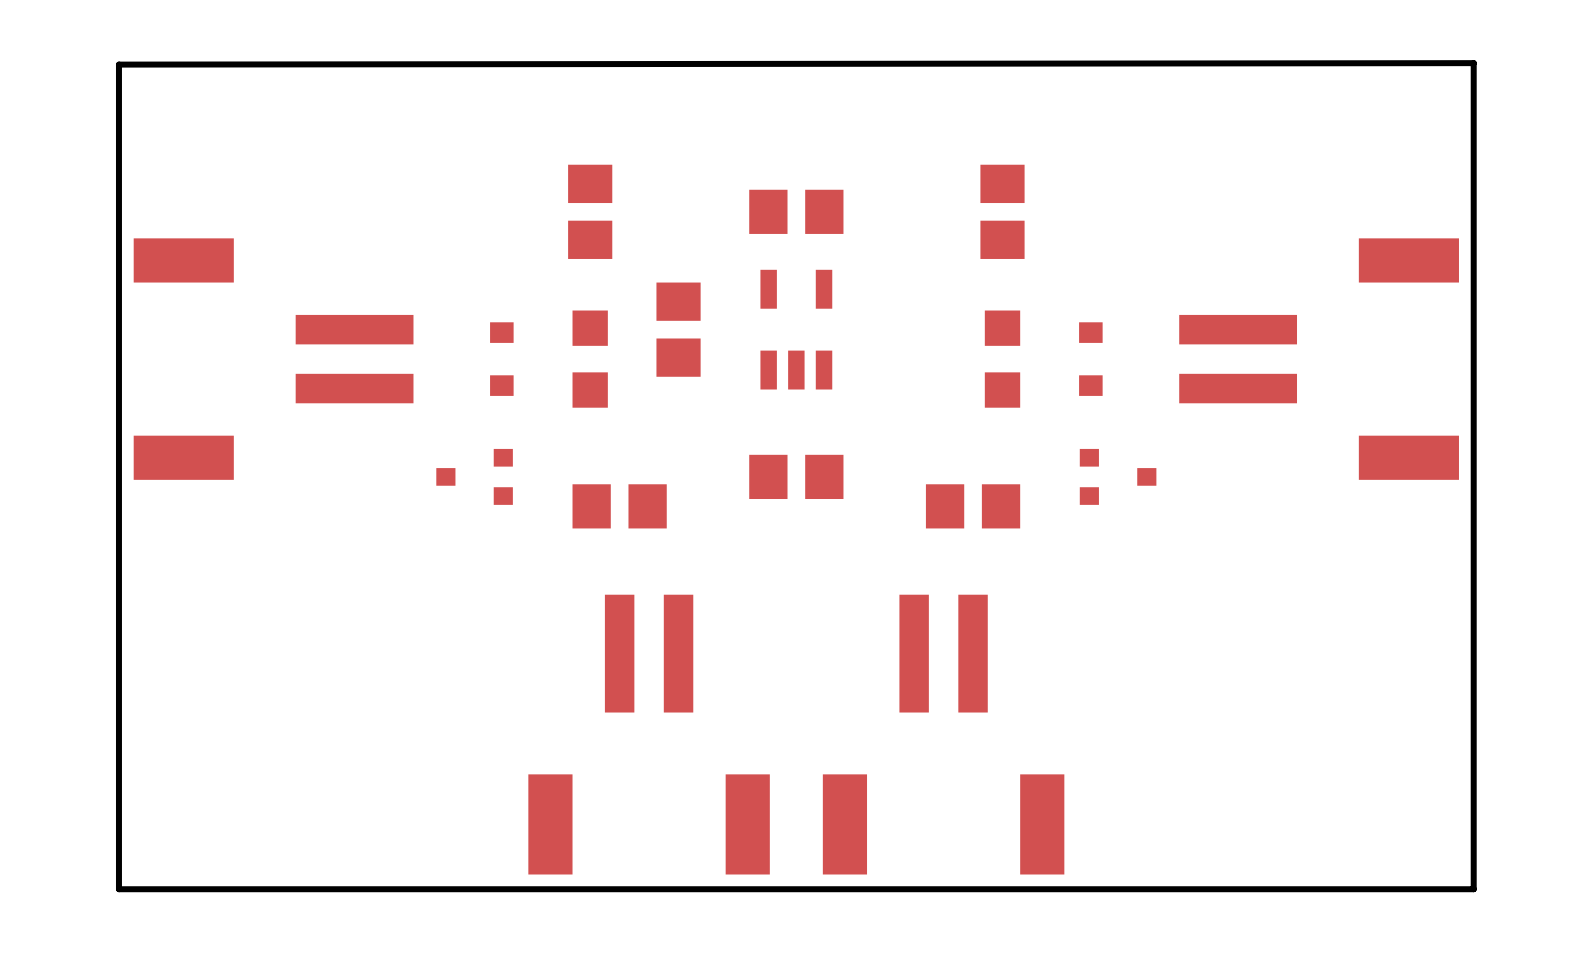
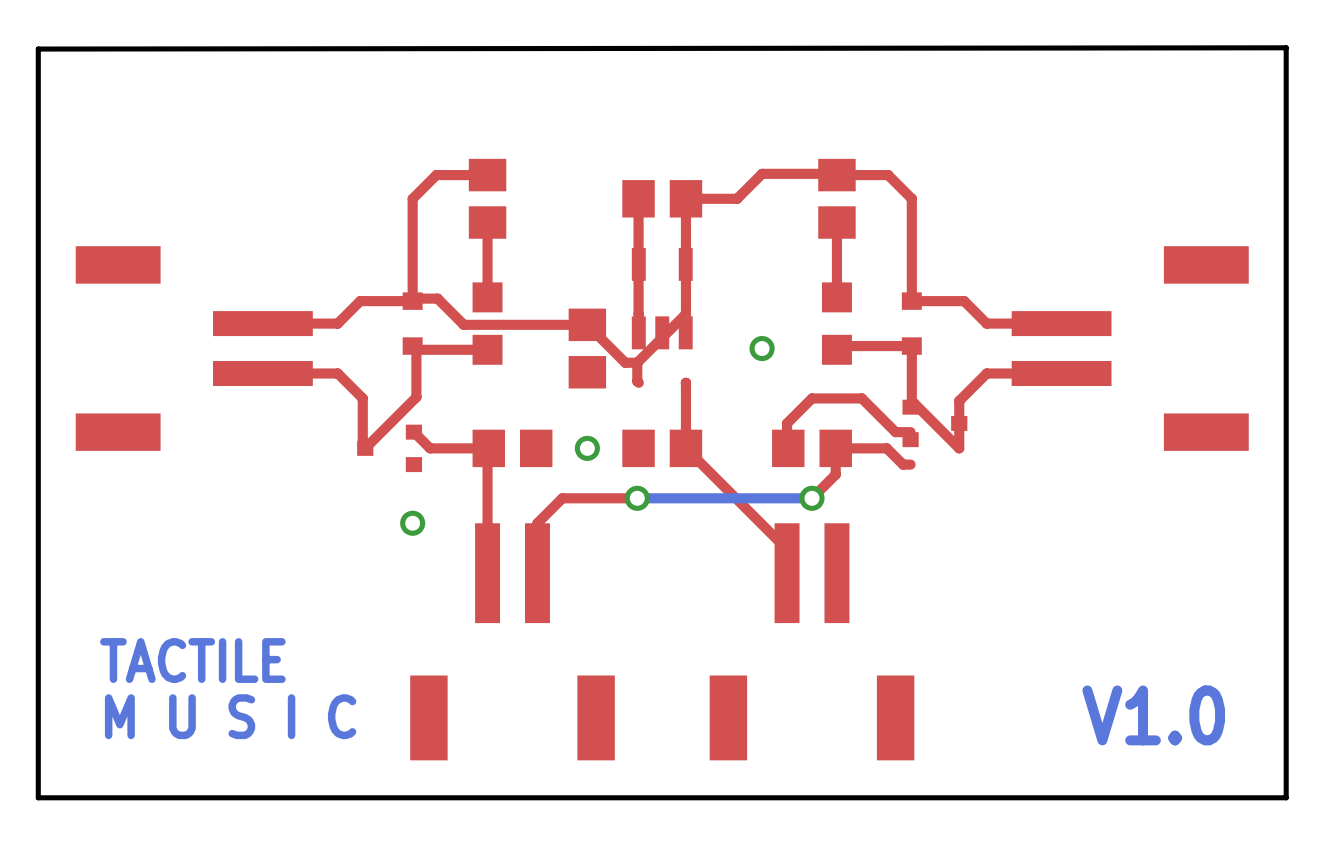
board edge: (1473, 63) (1473, 889) (118, 889) (118, 64) (1473, 63) -> (1286, 47) (1286, 797) (38, 797) (38, 49) (1286, 47)
top track: none -> (487, 175) (436, 175) (412, 198) (412, 301)
top track: none -> (638, 198) (638, 314)
top track: none -> (487, 222) (487, 297)
top track: none -> (836, 222) (836, 297)
part position: (678, 329) -> (587, 348)
top track: none -> (412, 301) (360, 301) (337, 323) (262, 323)
top track: none -> (412, 301) (415, 298) (437, 298) (463, 324) (587, 324) (625, 362) (637, 362)
top track: none -> (685, 314) (685, 198) (737, 198) (762, 173) (888, 175) (911, 198) (911, 301) (964, 301) (986, 323) (1061, 323)
part position: (273, 359) -> (194, 348)
part position: (1319, 359) -> (1130, 348)
top track: none -> (685, 325) (685, 314) (637, 362)
via: none -> (762, 348)
top track: none -> (416, 349) (416, 397) (365, 448) (362, 445) (362, 398) (337, 373) (262, 373)
top track: none -> (487, 349) (416, 349)
top track: none -> (836, 349) (840, 346) (911, 346) (911, 400) (959, 448) (959, 400) (986, 373) (1061, 373)
top track: none -> (637, 362) (638, 382)
top track: none -> (685, 382) (685, 448) (787, 549) (787, 573)
part position: (474, 476) -> (389, 448)
part position: (796, 476) -> (662, 448)
top track: none -> (413, 432) (430, 448) (488, 448) (487, 573)
top track: none -> (910, 432) (895, 432) (861, 398) (812, 398) (787, 423) (788, 448)
via: none -> (587, 448)
top track: none -> (910, 464) (903, 464) (886, 448) (835, 448) (835, 474) (812, 498)
top track: none -> (637, 498) (562, 498) (537, 523) (537, 573)
via: none -> (637, 498)
bottom track: none -> (812, 498) (637, 498)
via: none -> (812, 498)
via: none -> (412, 523)
part position: (649, 734) -> (512, 641)
part position: (943, 734) -> (812, 641)
text: none -> TACTILE (192, 660)
text: none -> V1.0 (1153, 715)
text: none -> M U S I C (230, 716)

